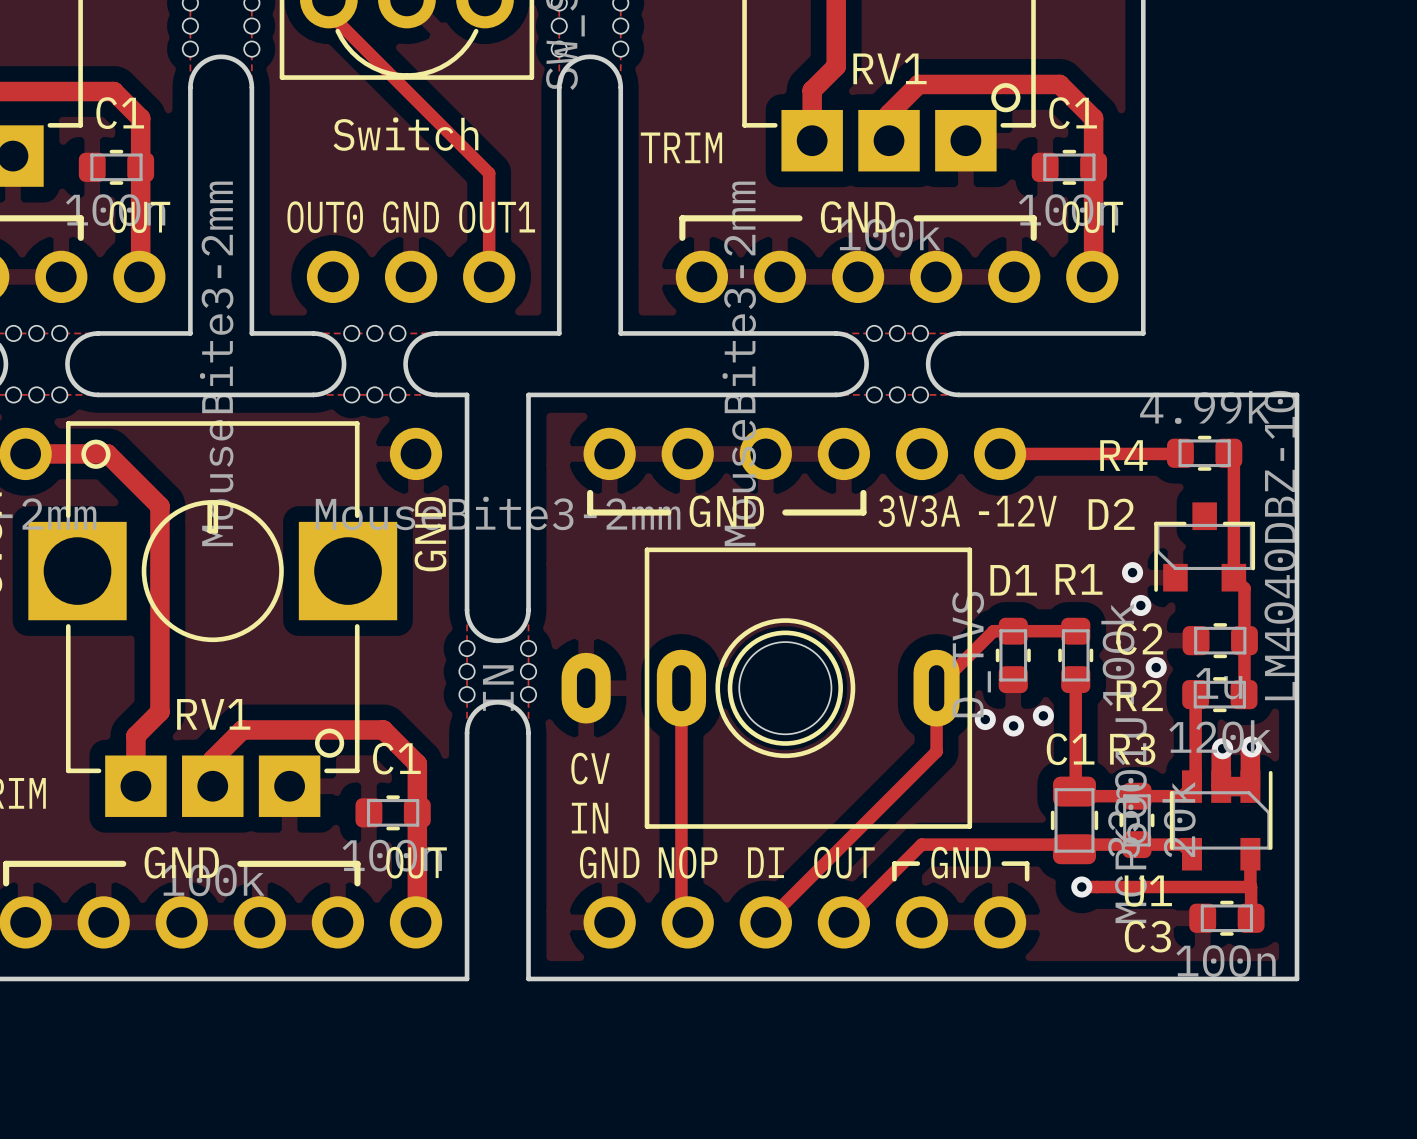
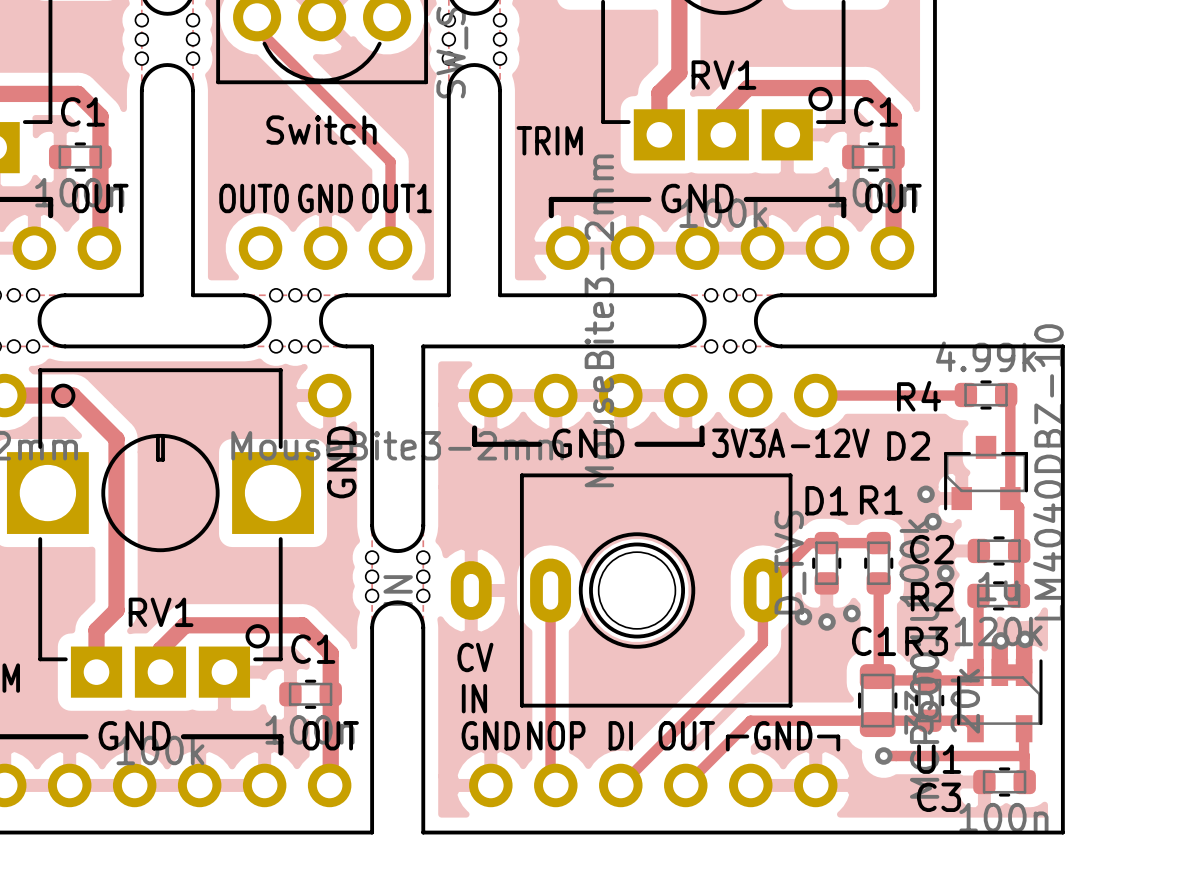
part value: MouseBite3-2mm (216, 363) -> none

